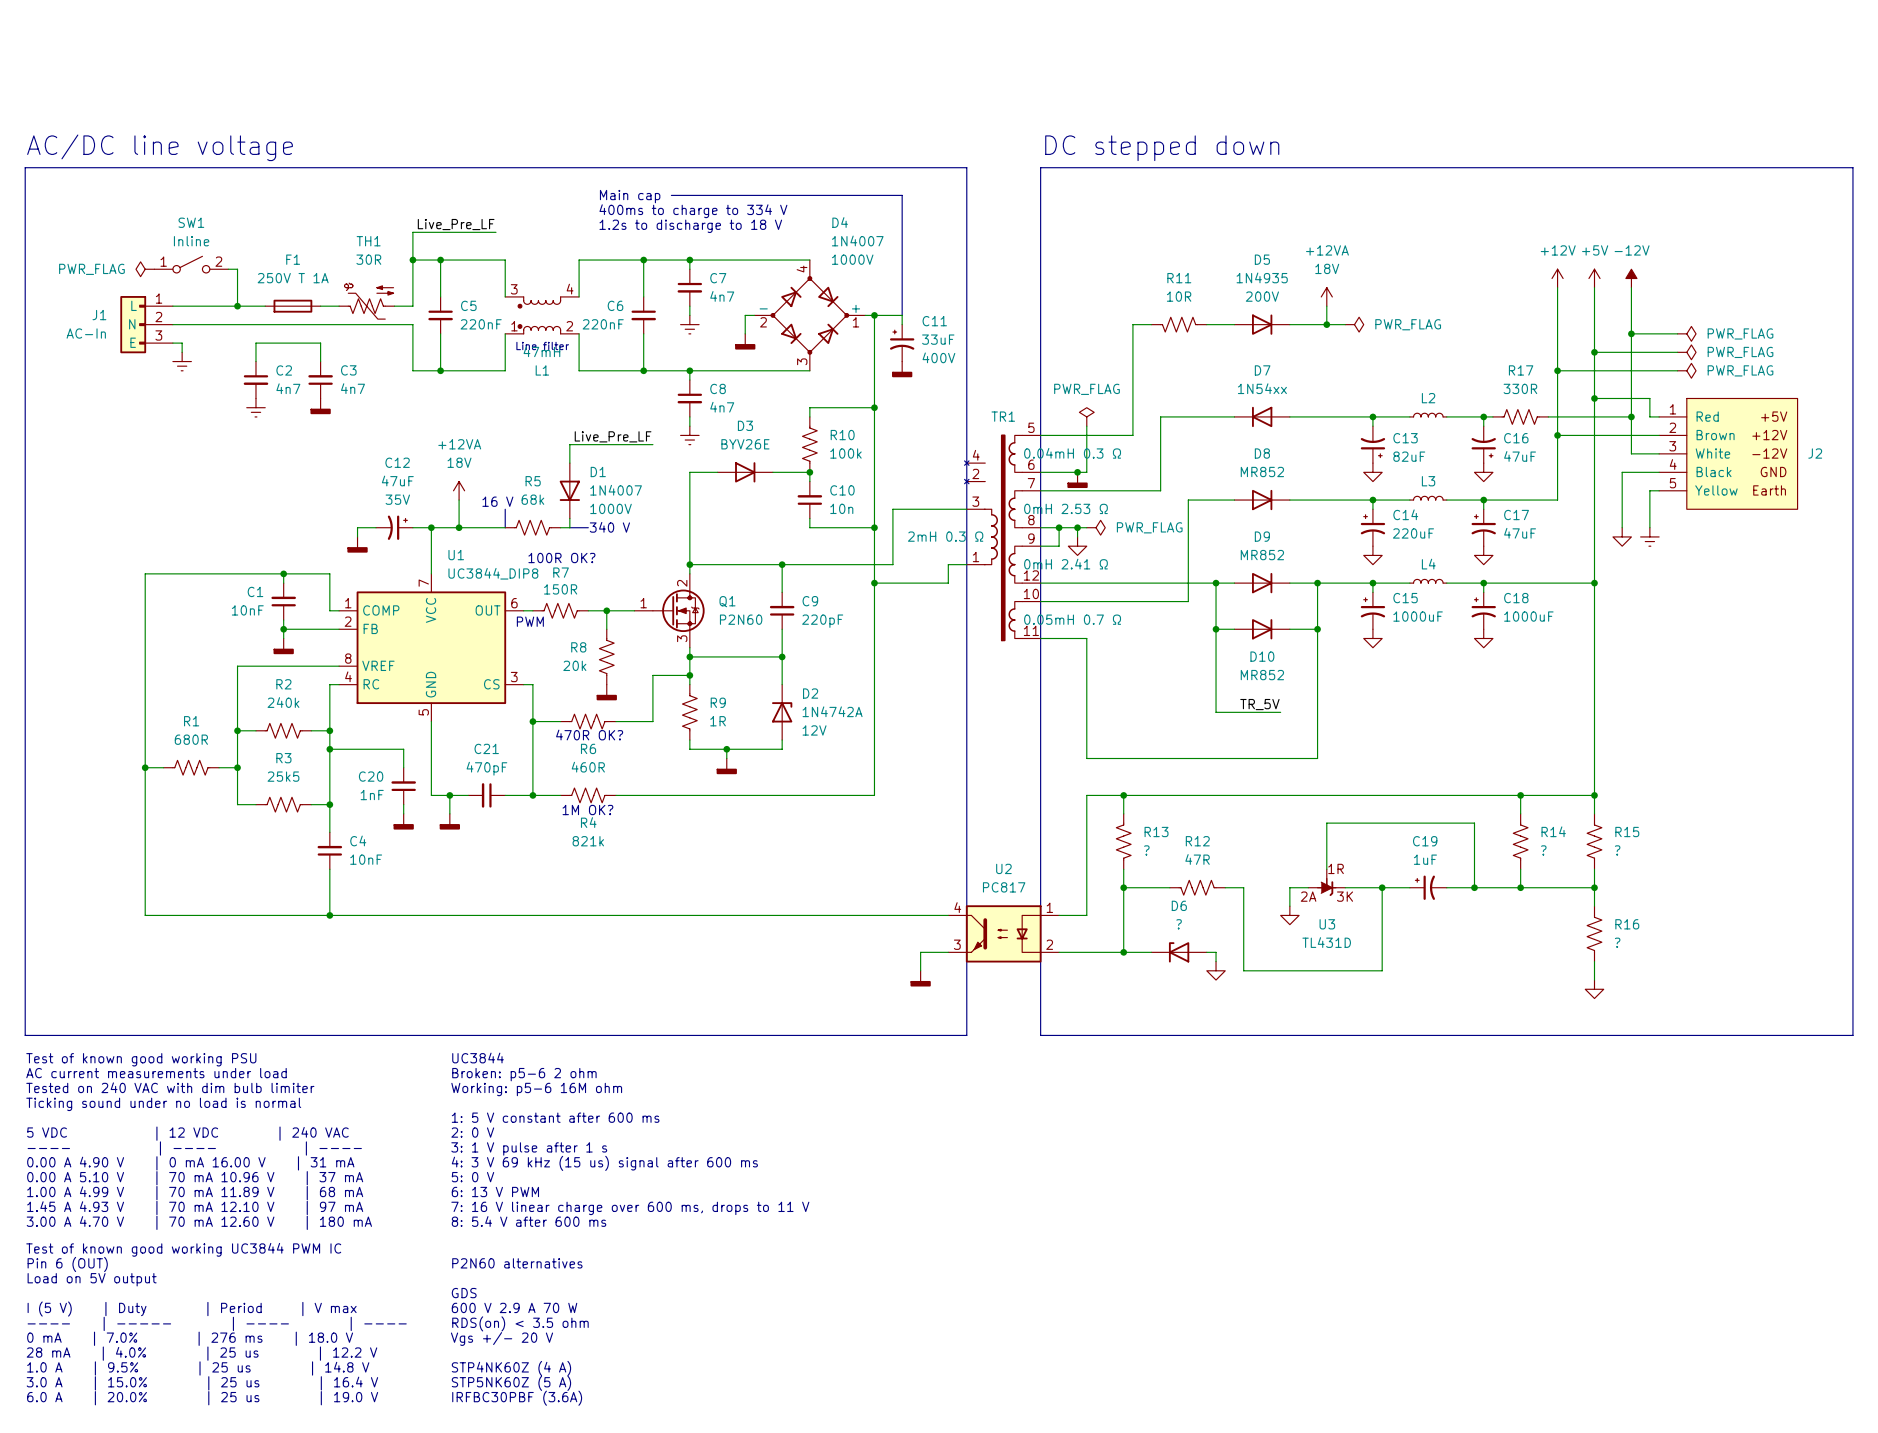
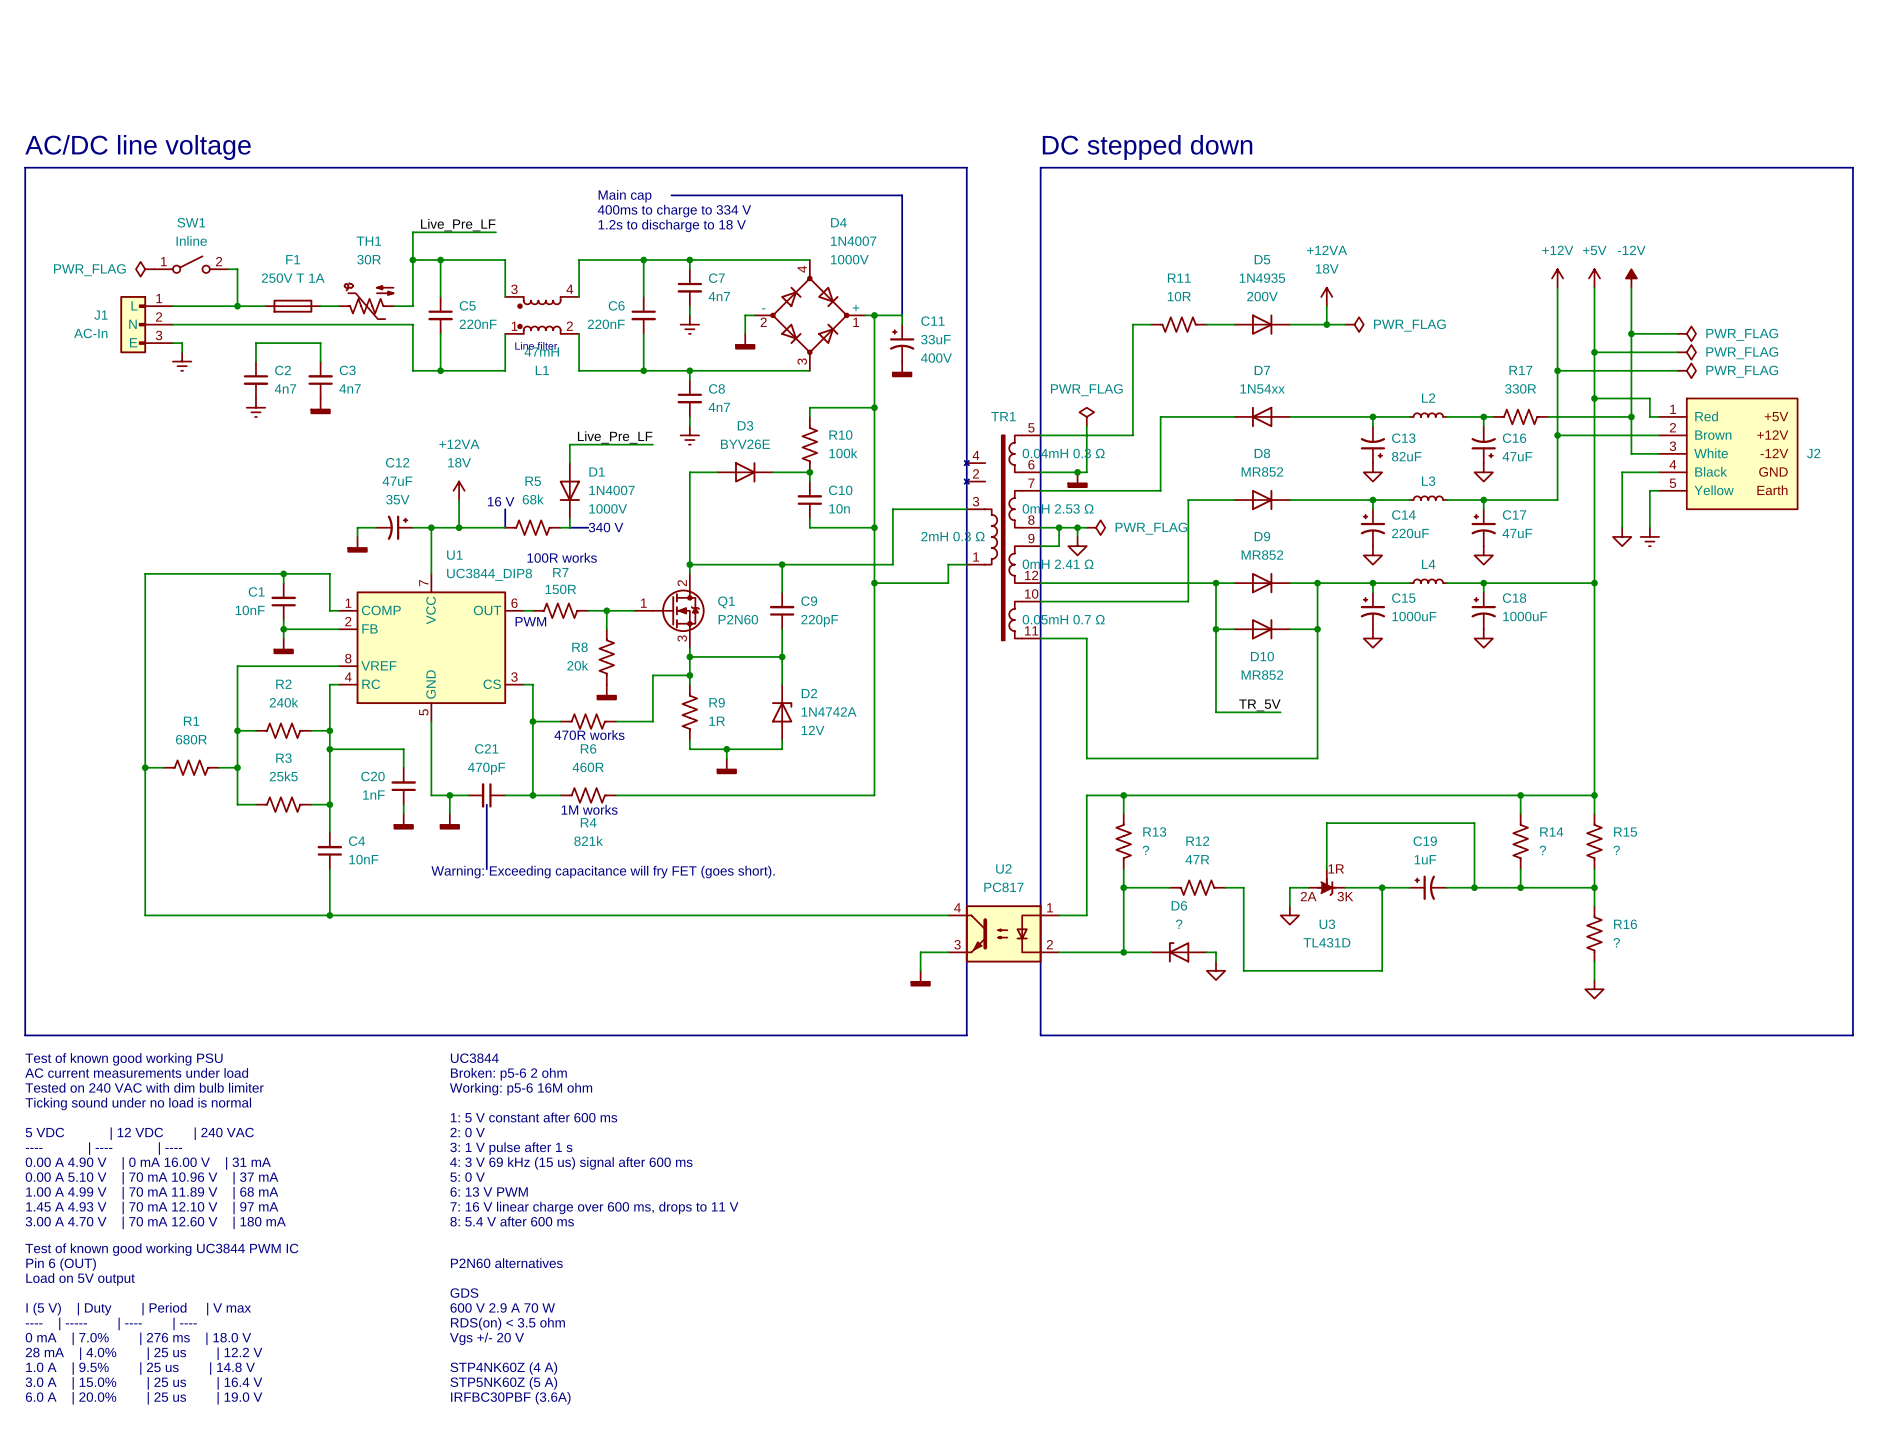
text: 100R OK? (561, 558) -> 100R works (562, 557)
text: 470R OK? (589, 735) -> 470R works (589, 735)
line: none -> (486, 804) (486, 869)
text: 1M OK? (587, 810) -> 1M works (589, 809)
text: none -> Warning: Exceeding capacitance will fry FET (goes short). (603, 872)

